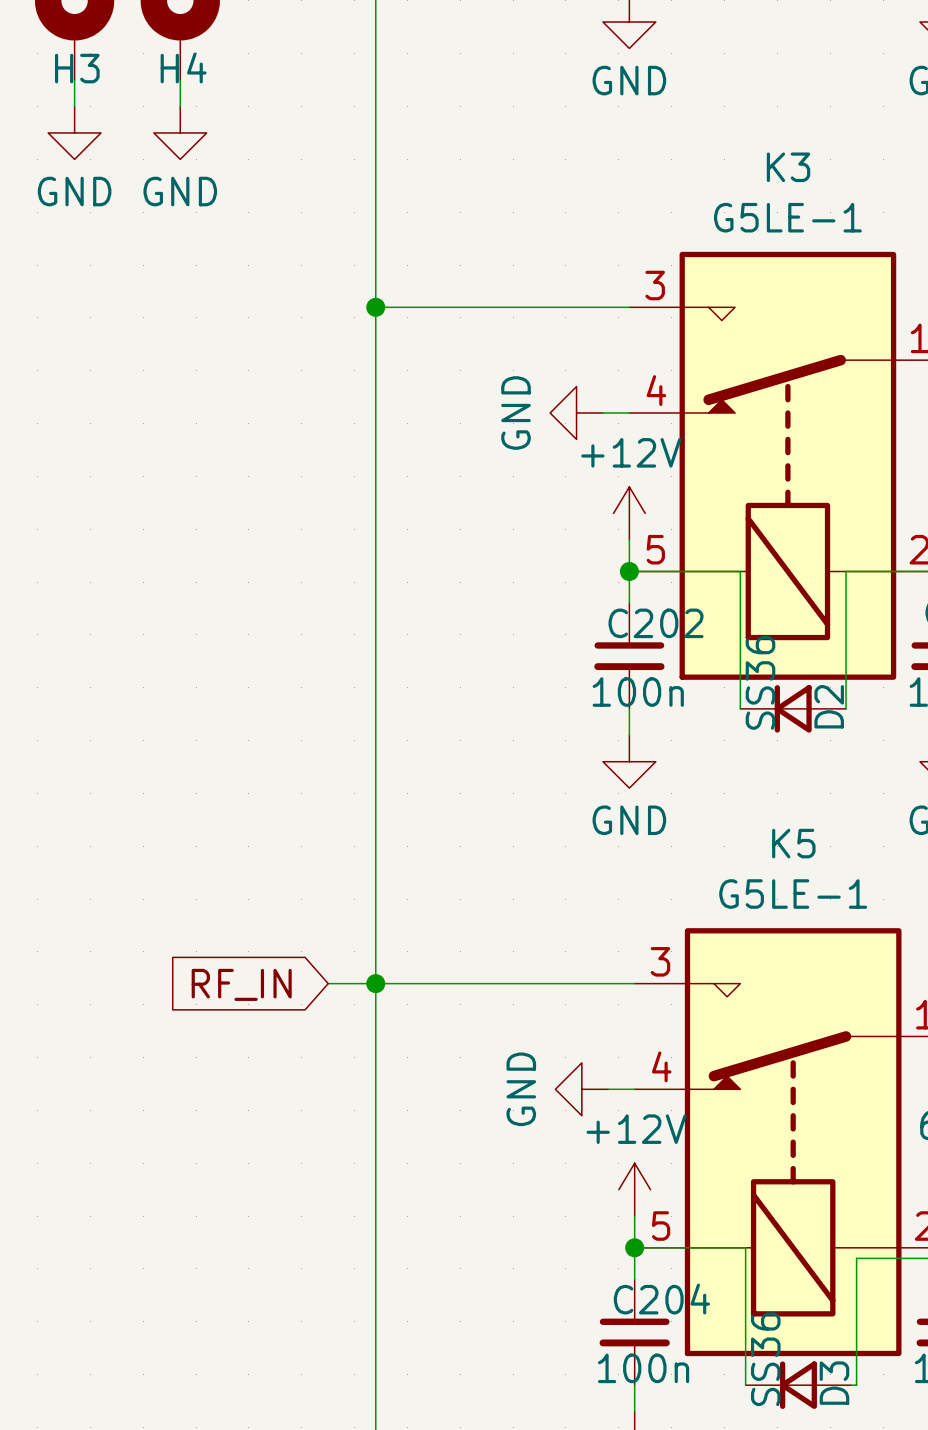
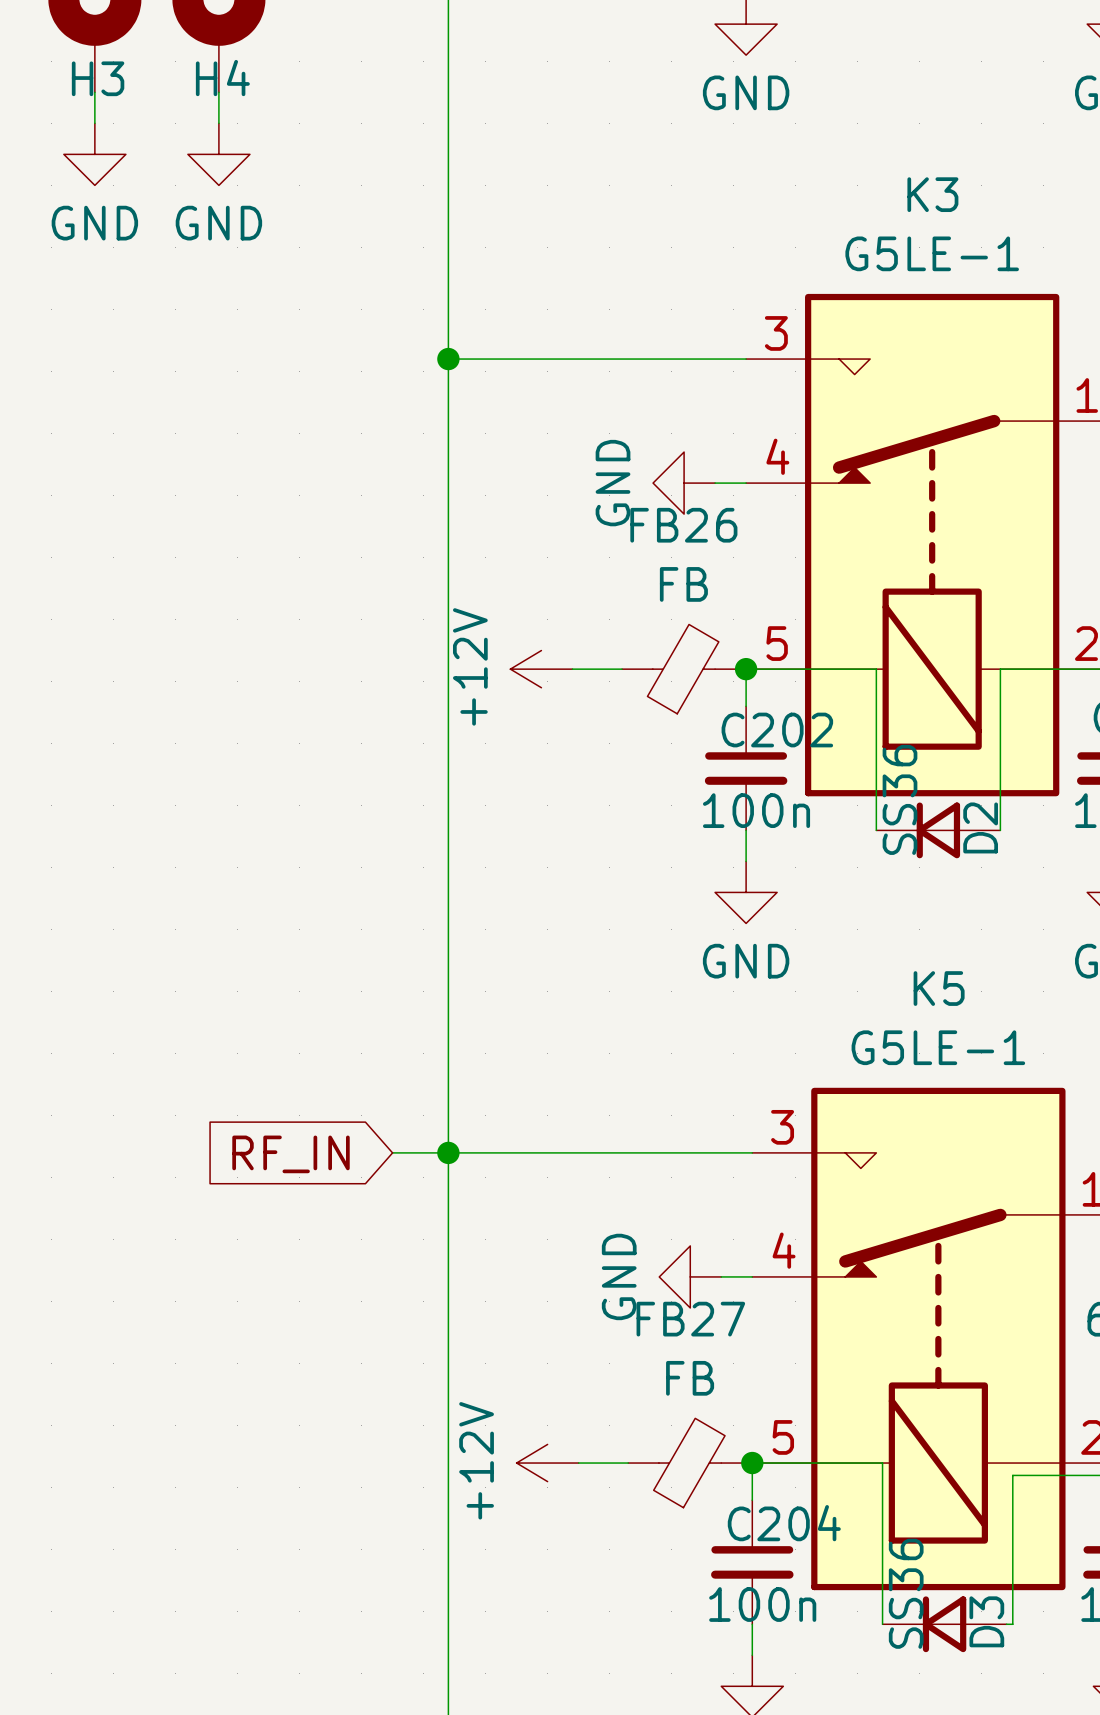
power symbol rotation: 0° (629, 513) -> 90° counterclockwise (541, 669)
power symbol position: +12V (629, 513) -> +12V (541, 669)
wire: (629, 539) (629, 571) -> none
wire: none -> (572, 669) (622, 669)
FB26: none -> FB (684, 669)
power symbol rotation: 0° (634, 1189) -> 90° counterclockwise (547, 1463)
power symbol position: +12V (634, 1189) -> +12V (547, 1463)
wire: (634, 1216) (634, 1247) -> none
wire: none -> (578, 1463) (628, 1463)
FB27: none -> FB (690, 1463)

